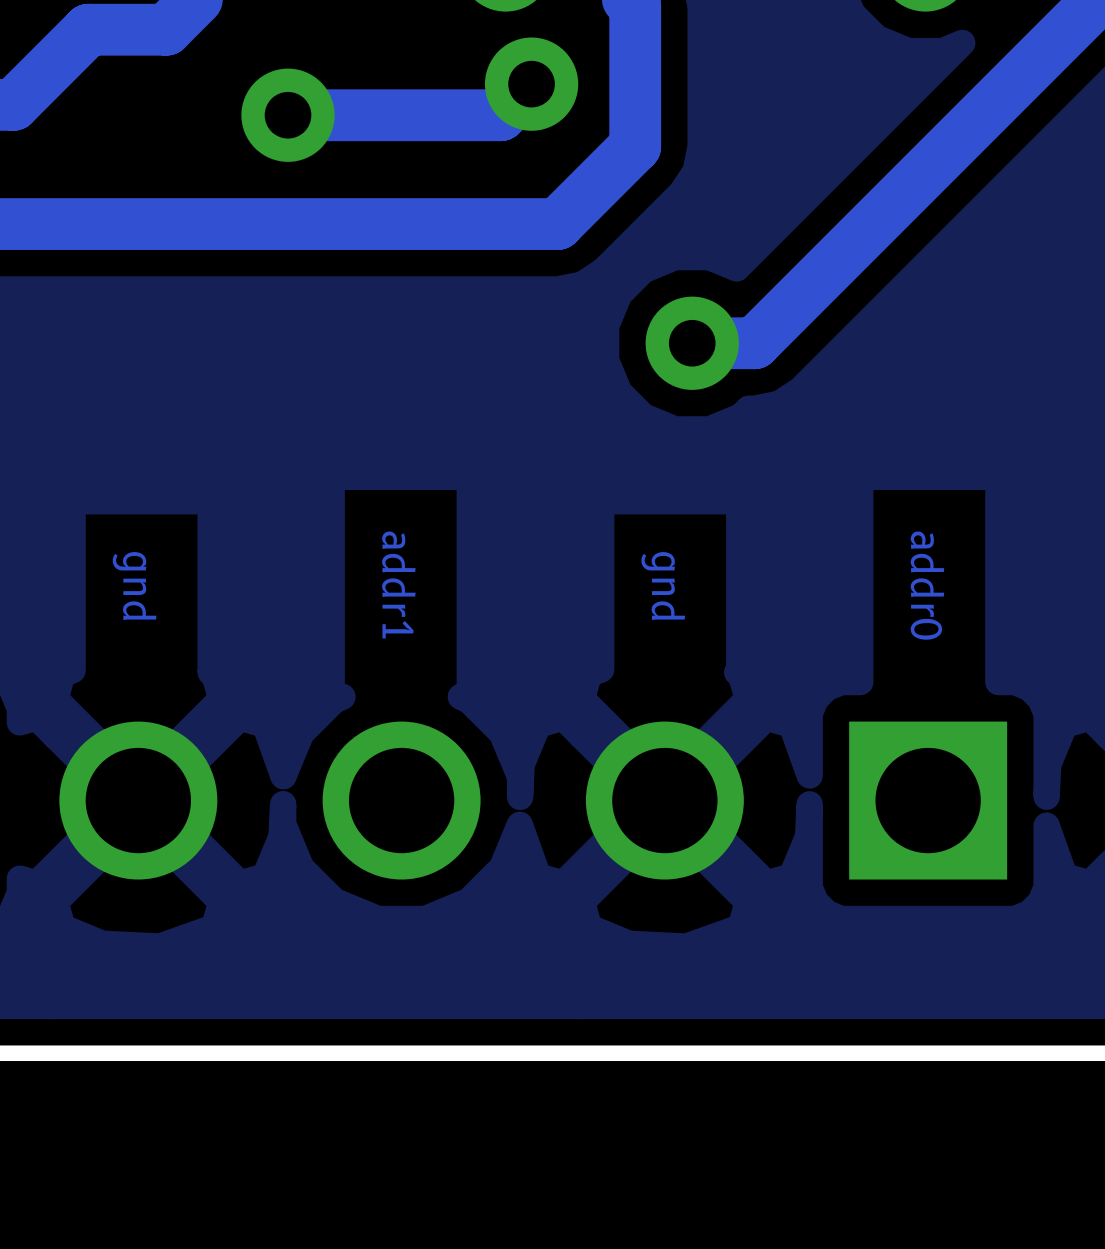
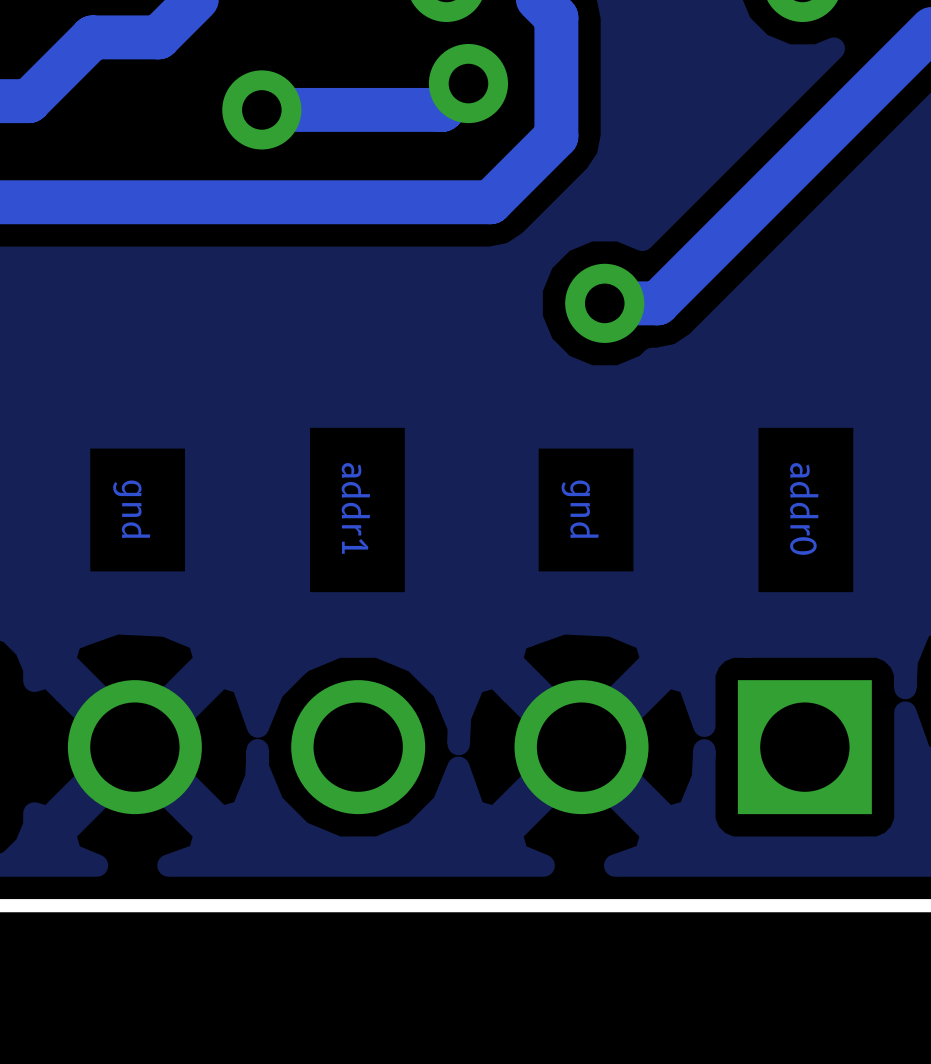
part position: (533, 800) -> (469, 747)

